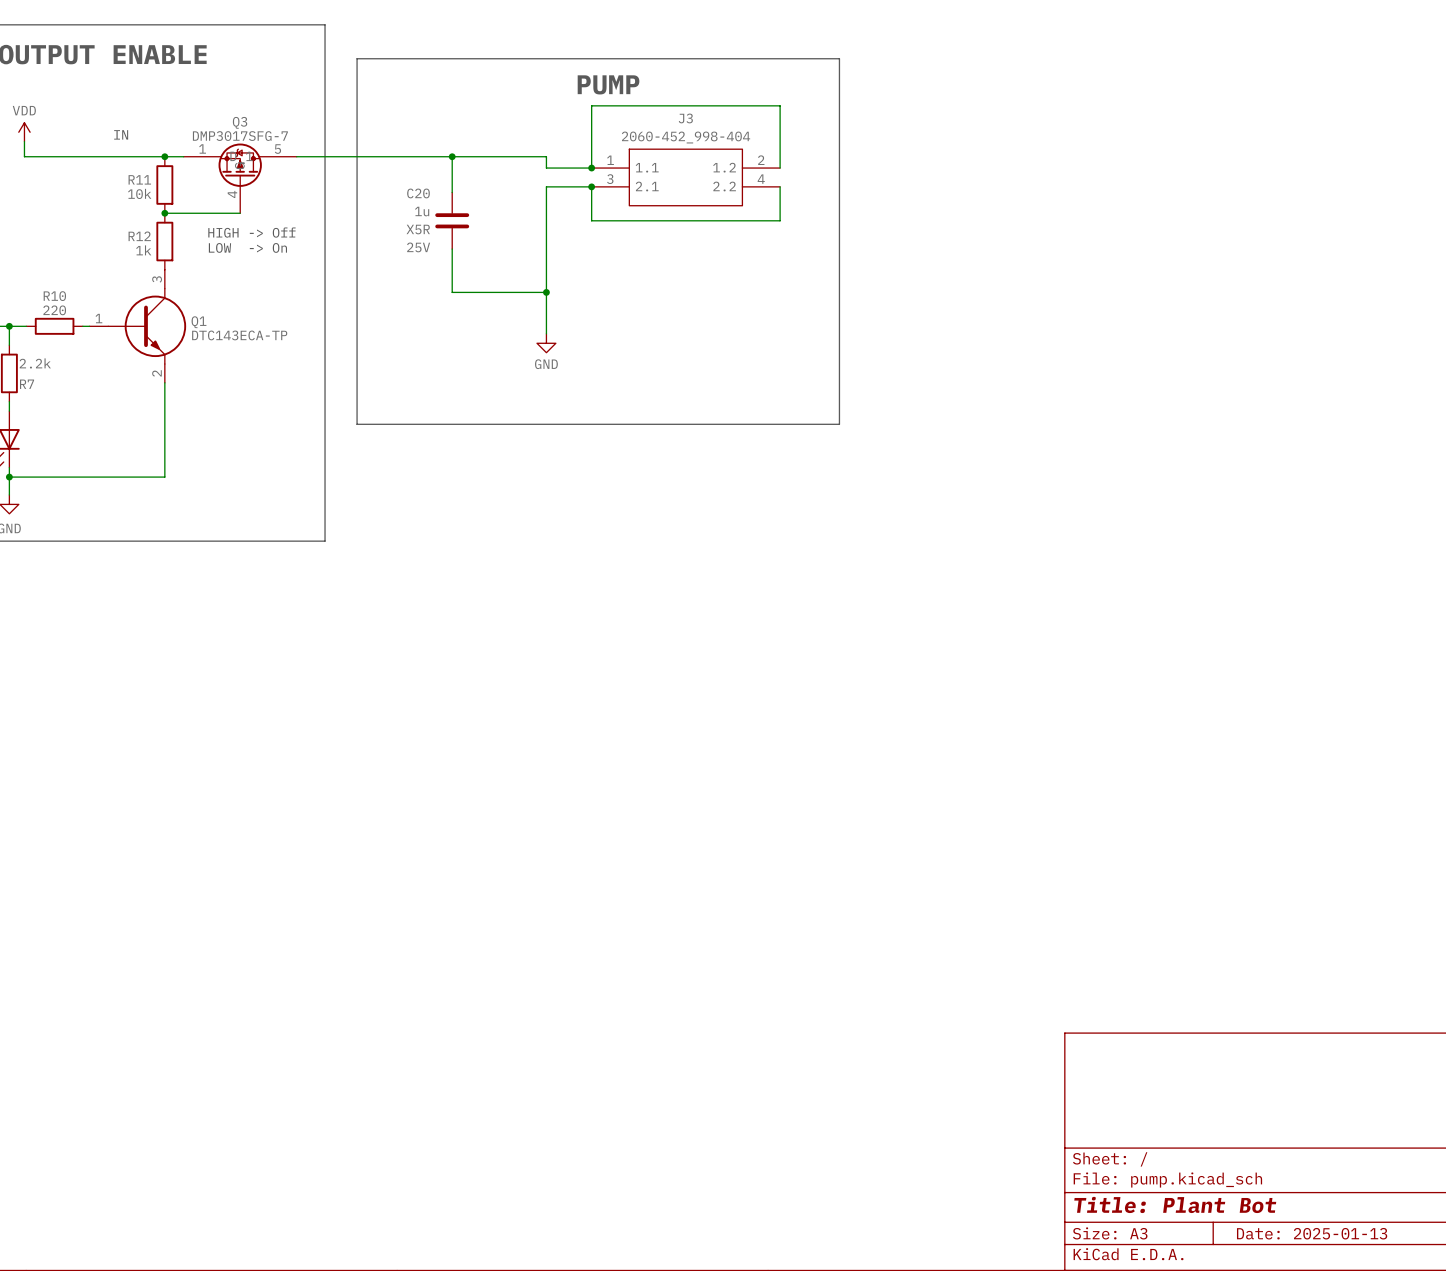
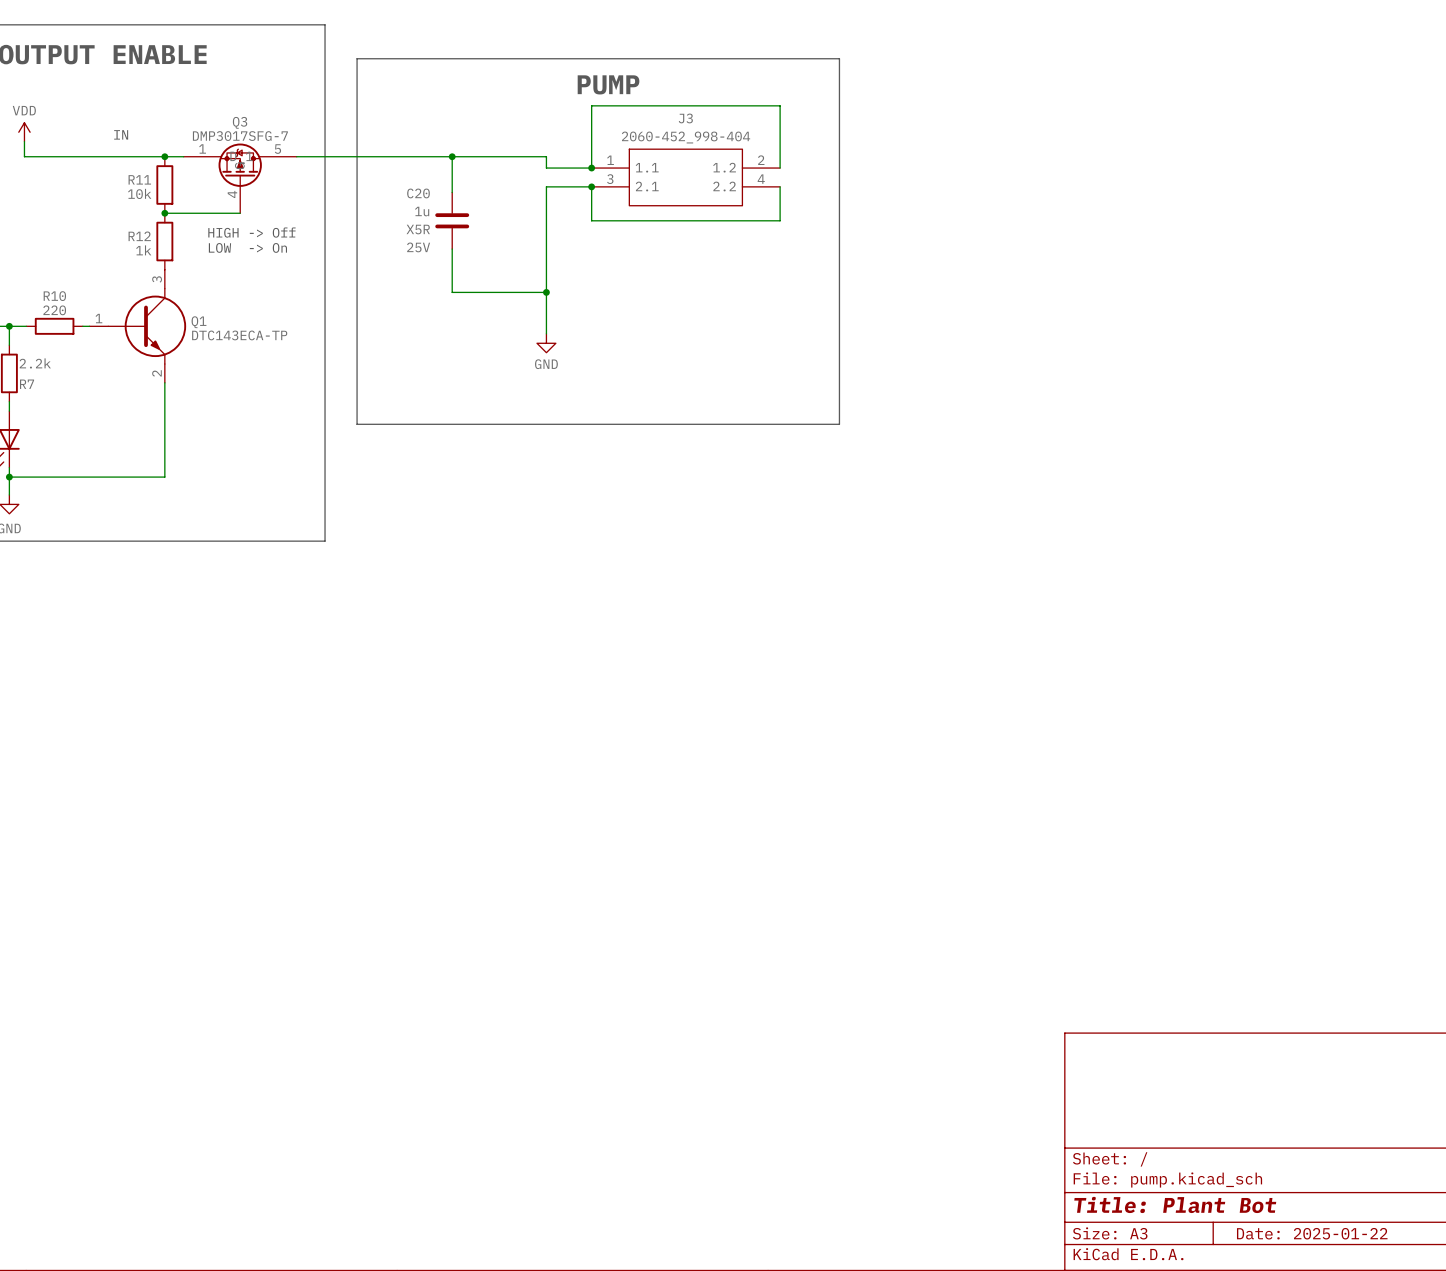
title block: Date: 2025-01-13 (1312, 1233) -> Date: 2025-01-22 (1312, 1233)

